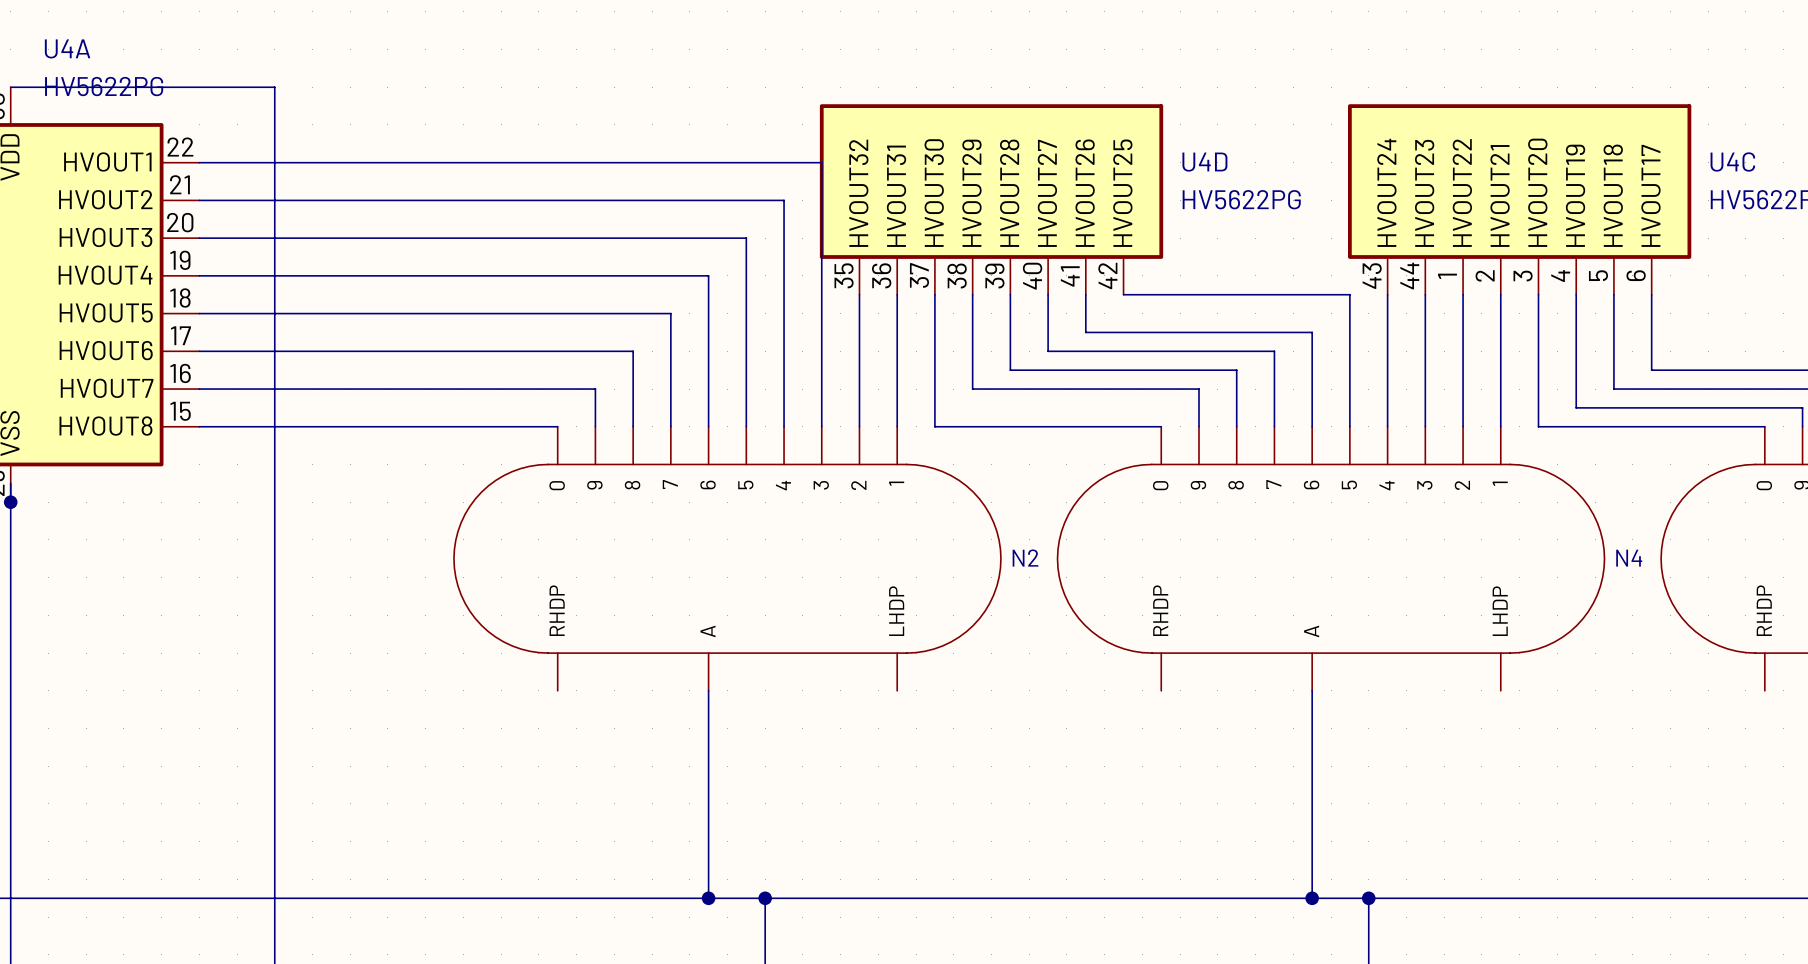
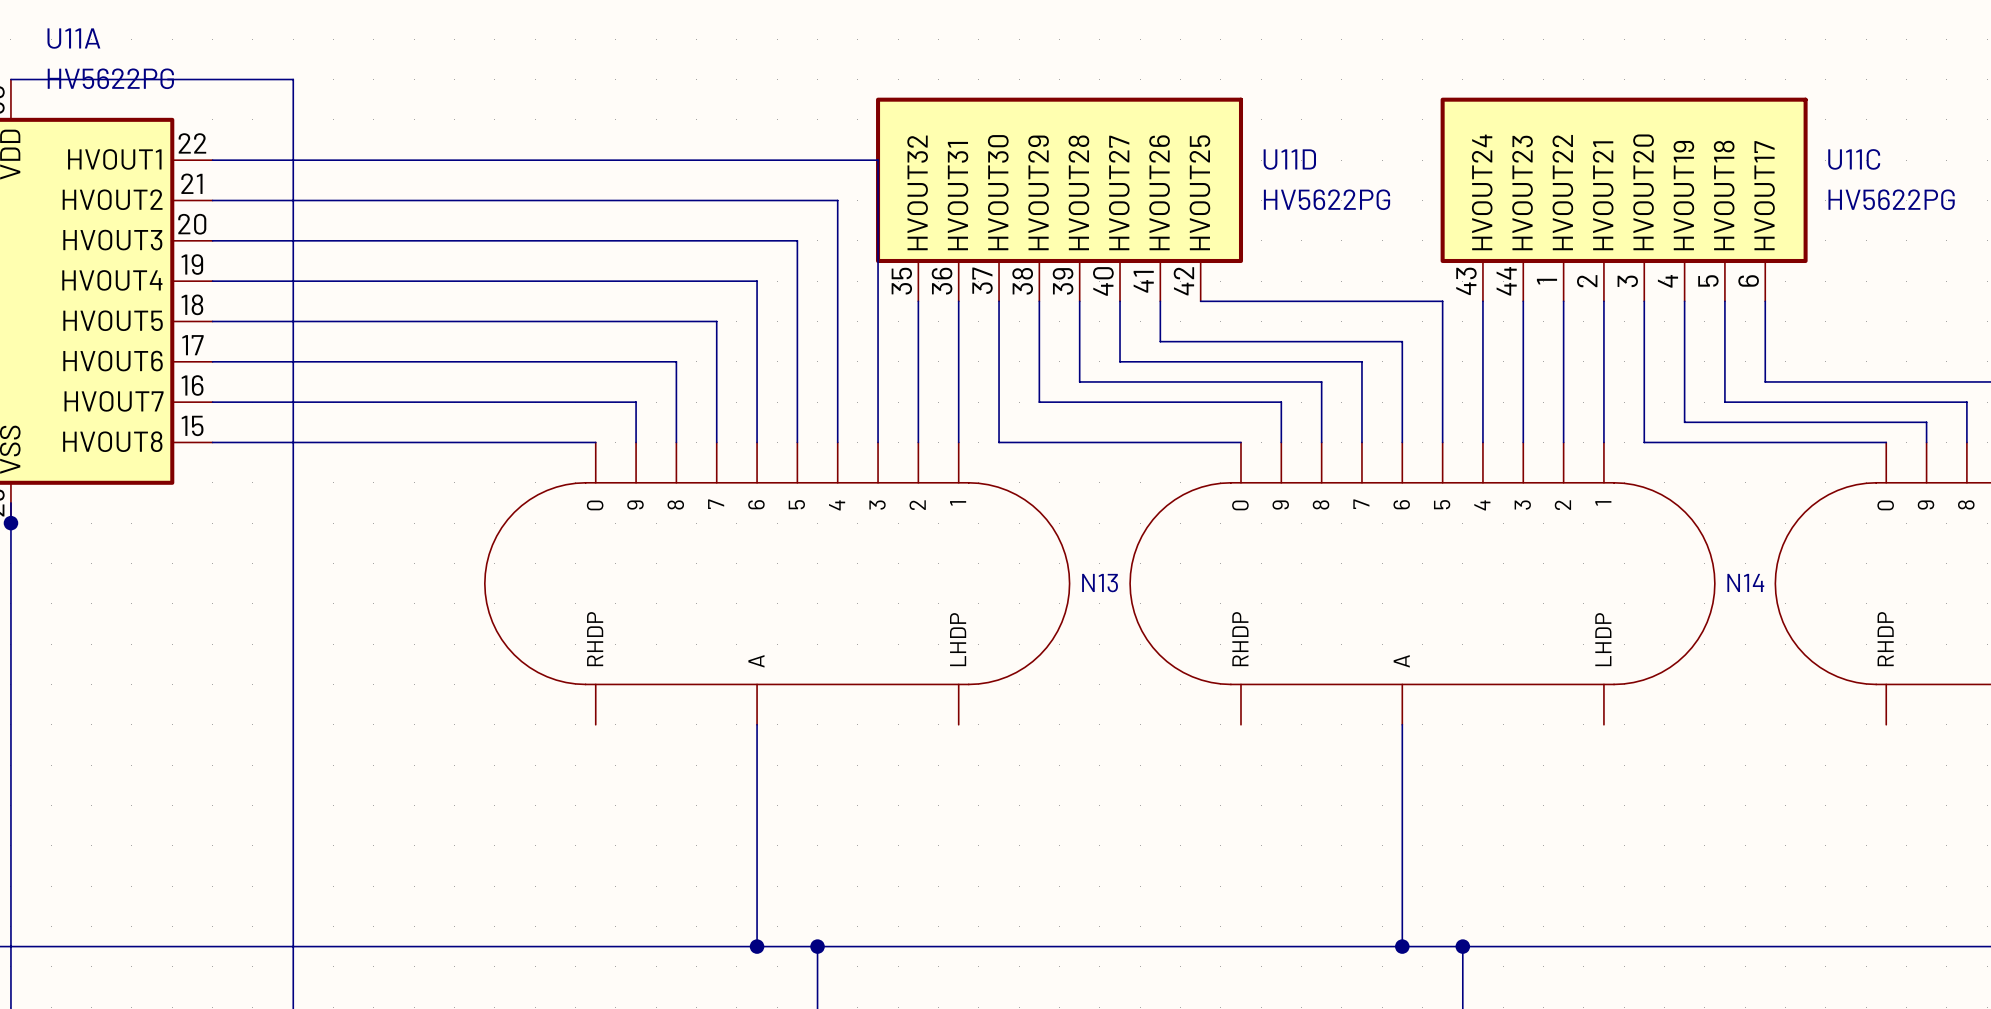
U4A name: U4A (67, 48) -> U11A (73, 38)
U4D name: U4D (1204, 162) -> U11D (1289, 159)
U4C name: U4C (1732, 162) -> U11C (1854, 159)
N2 name: N2 (1025, 558) -> N13 (1100, 583)
N4 name: N4 (1629, 558) -> N14 (1745, 582)

